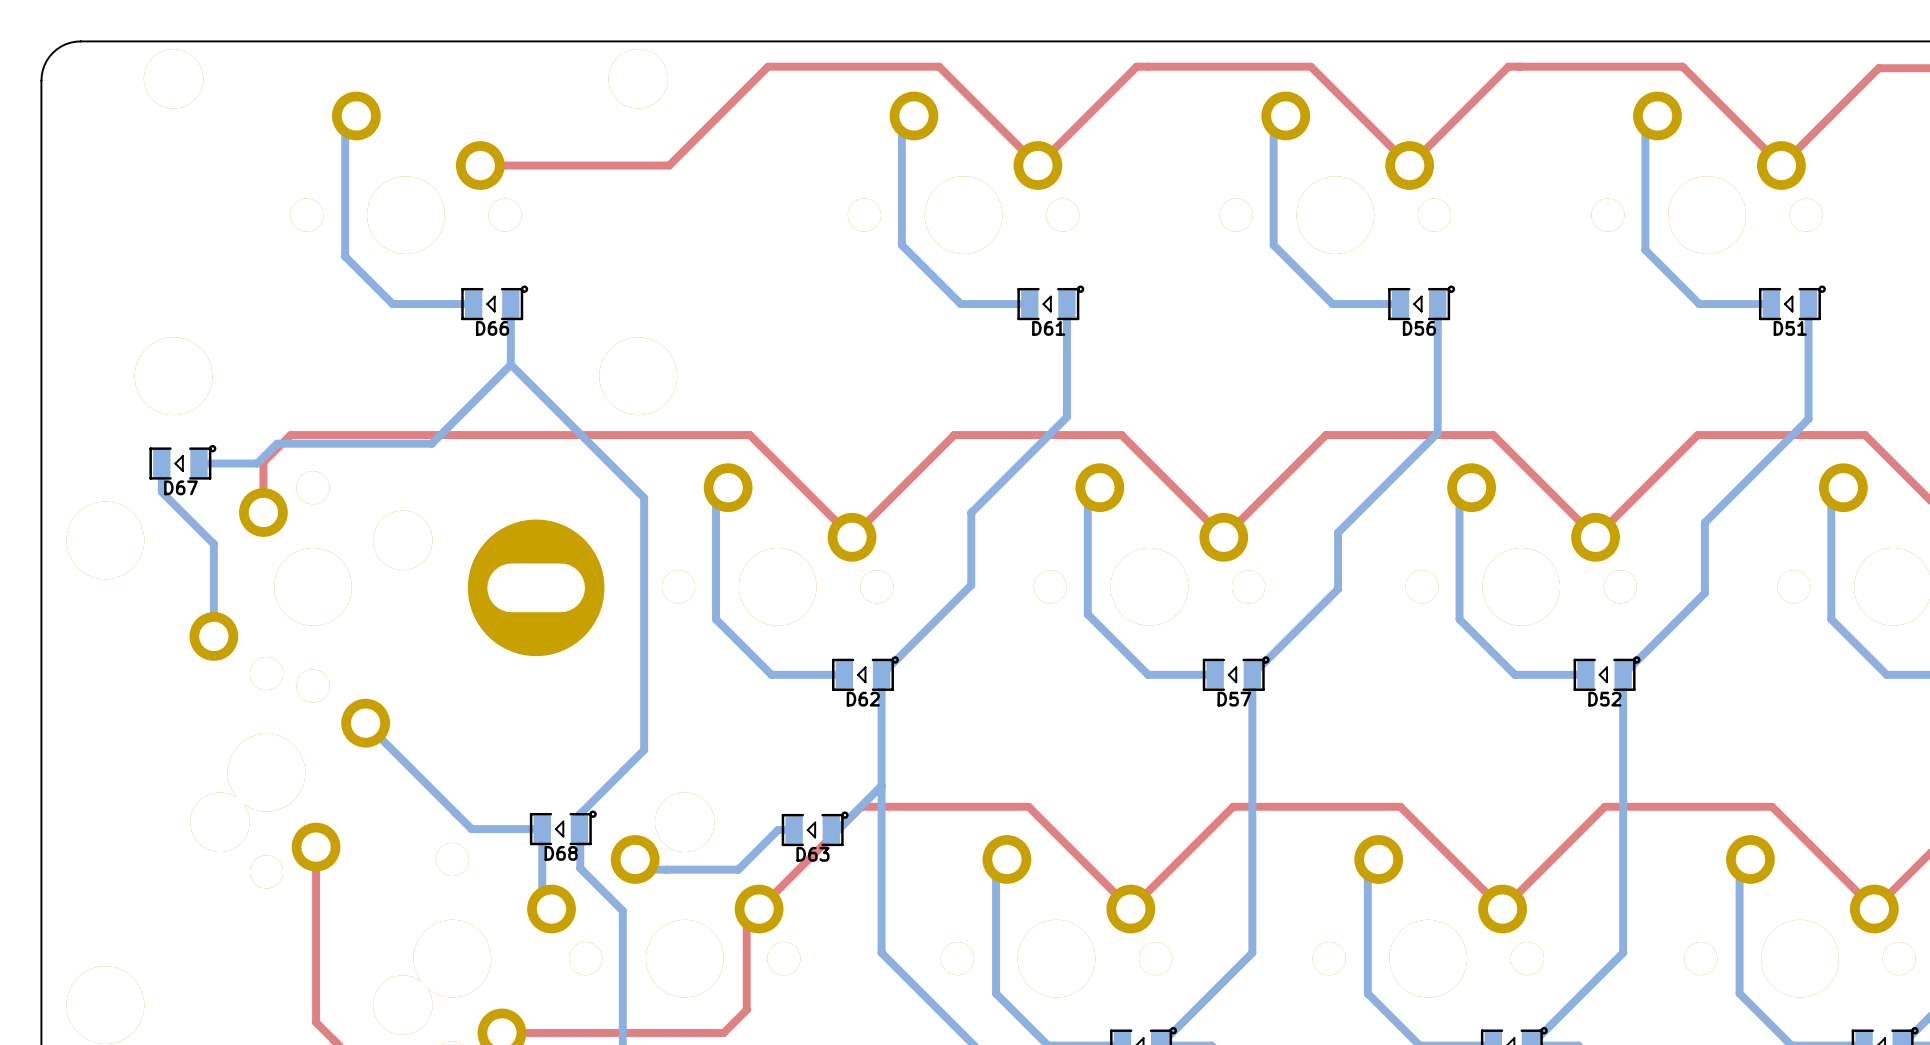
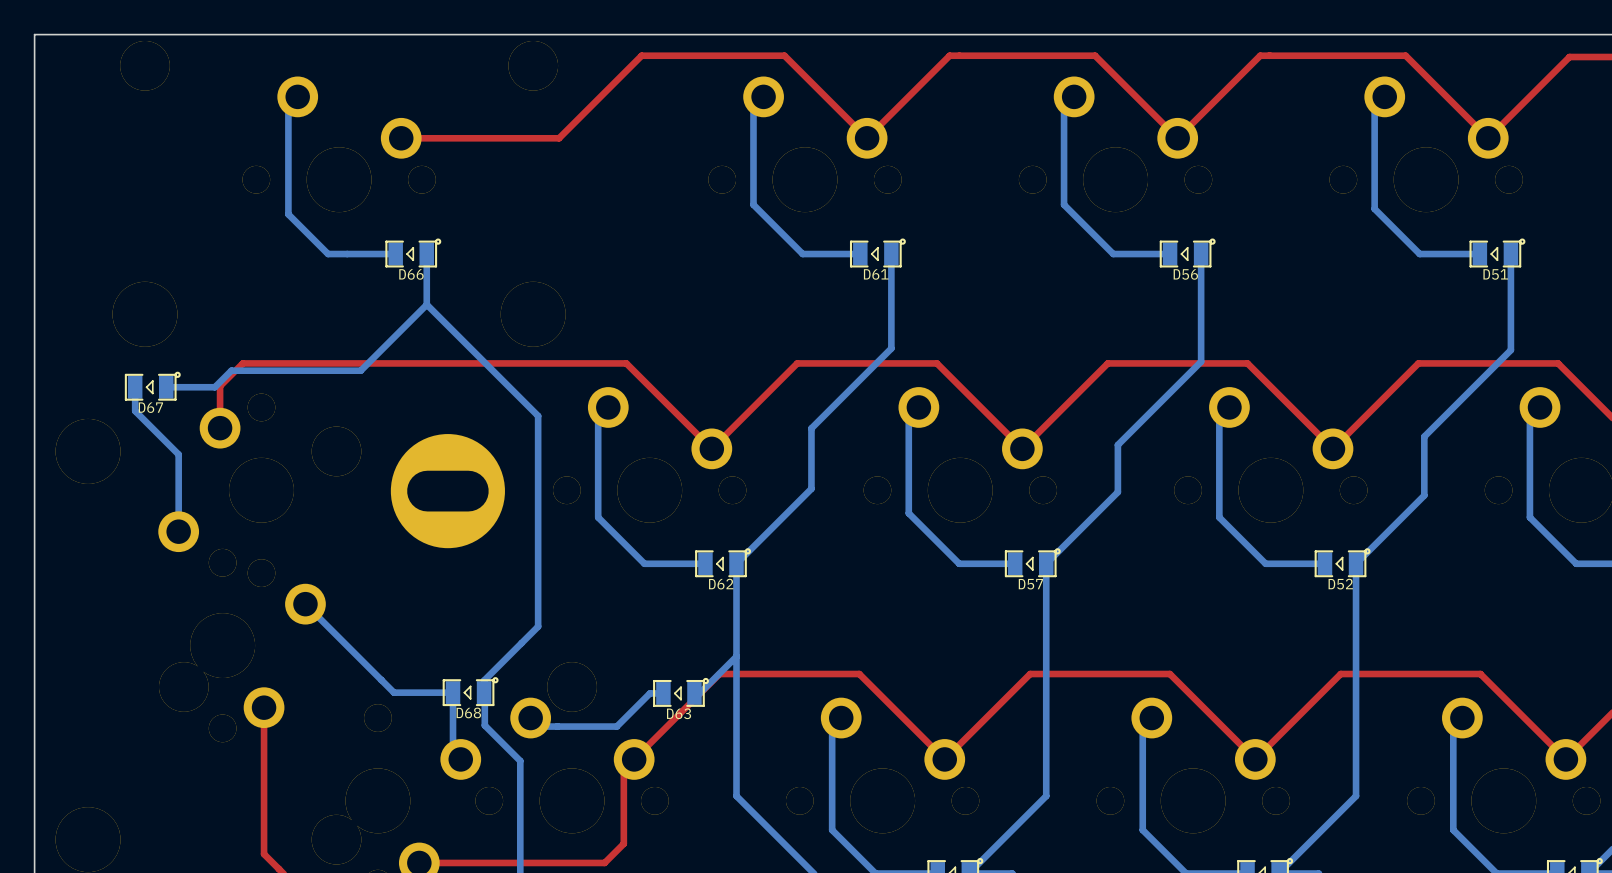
board edge: (80, 41) (65, 44) (52, 52) (44, 65) (41, 80) -> (67, 34) (34, 34) (34, 67)

